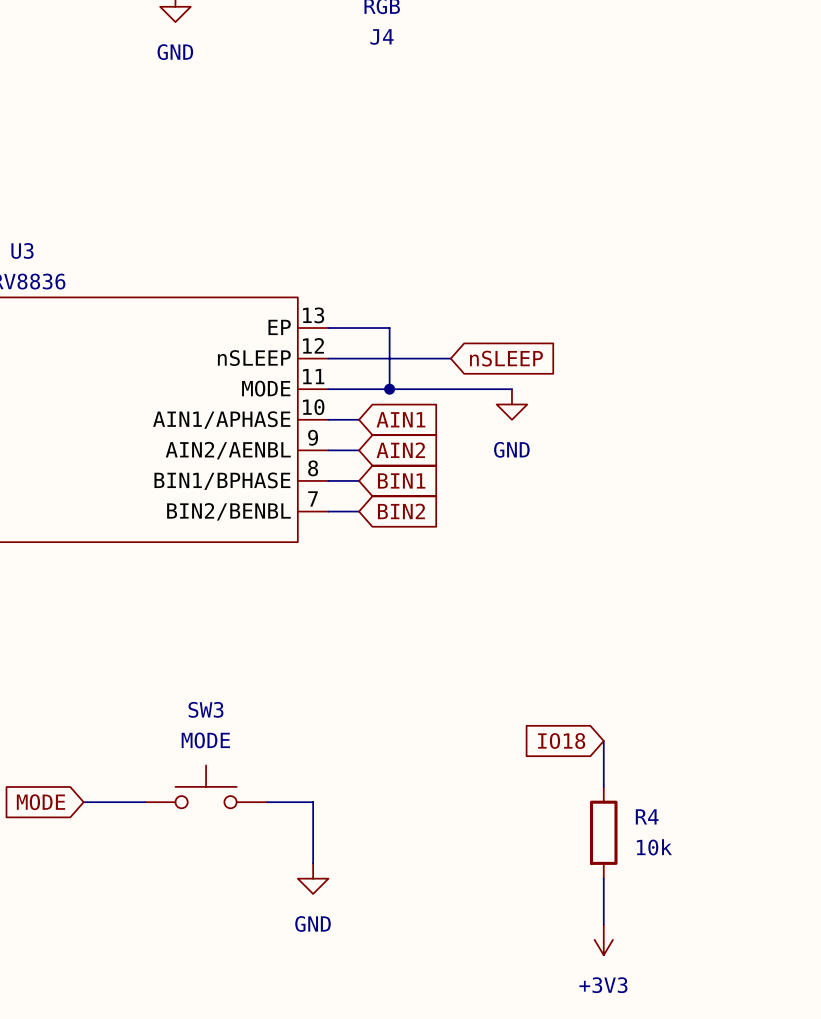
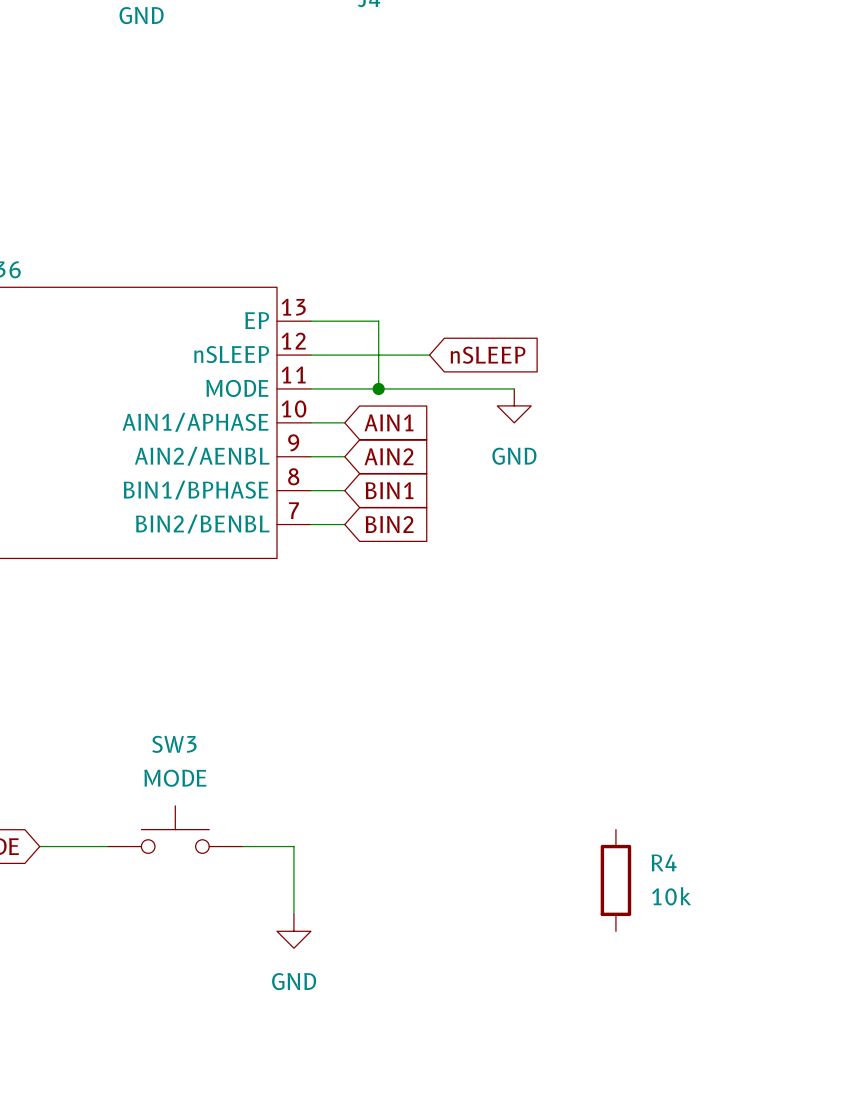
wire: (435, 358) (450, 358) -> none
global label position: nSLEEP (506, 358) -> nSLEEP (488, 355)
global label: IO18 (561, 741) -> none
wire: (603, 741) (603, 786) -> none
wire: (603, 878) (603, 924) -> none
power symbol: +3V3 (603, 939) -> none

